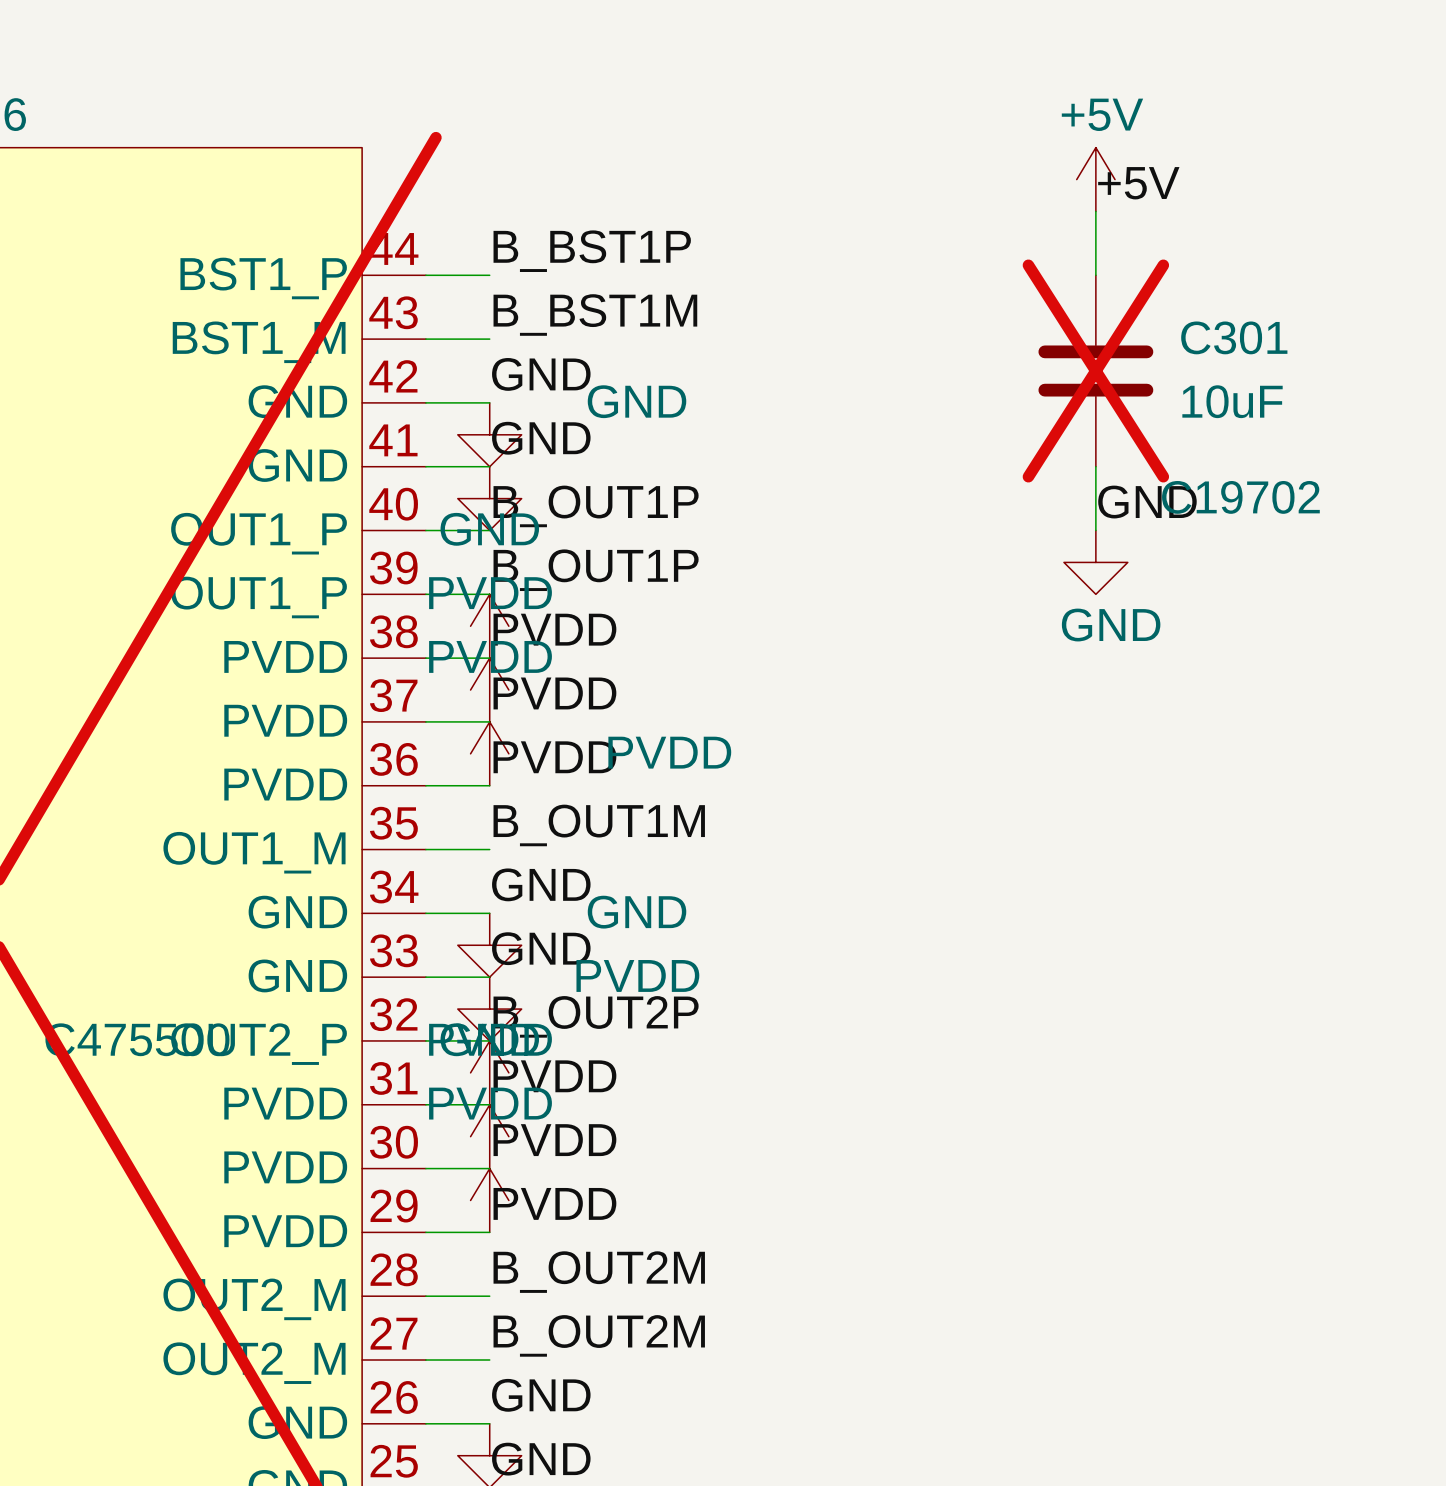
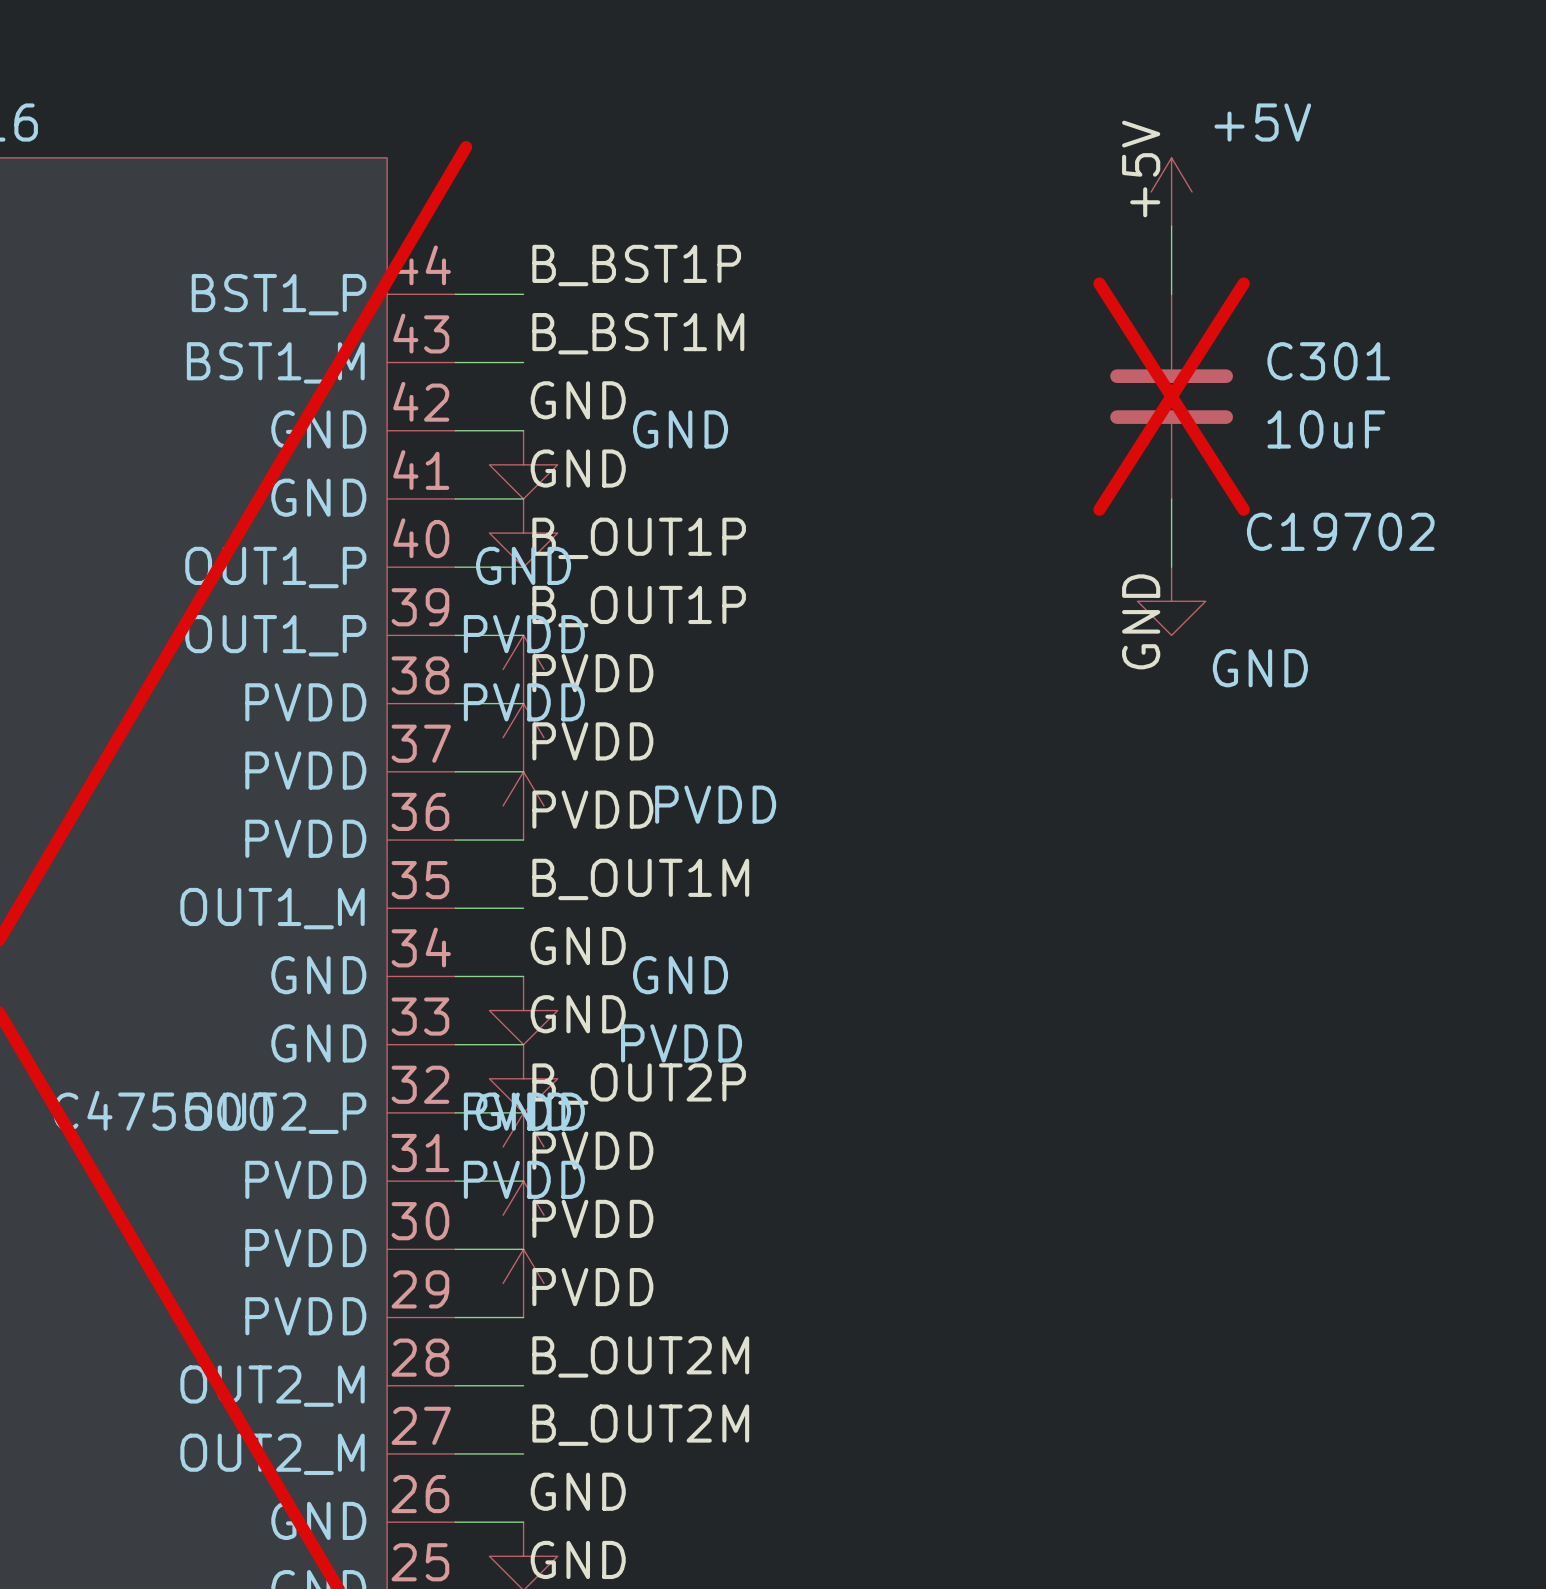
power symbol text position: +5V (1102, 114) -> +5V (1262, 122)
label rotation: 0° (1138, 183) -> 90° counterclockwise (1141, 169)
label rotation: 0° (1147, 502) -> 90° counterclockwise (1141, 621)
label position: GND (1147, 502) -> GND (1141, 621)
power symbol text position: GND (1111, 625) -> GND (1260, 668)

